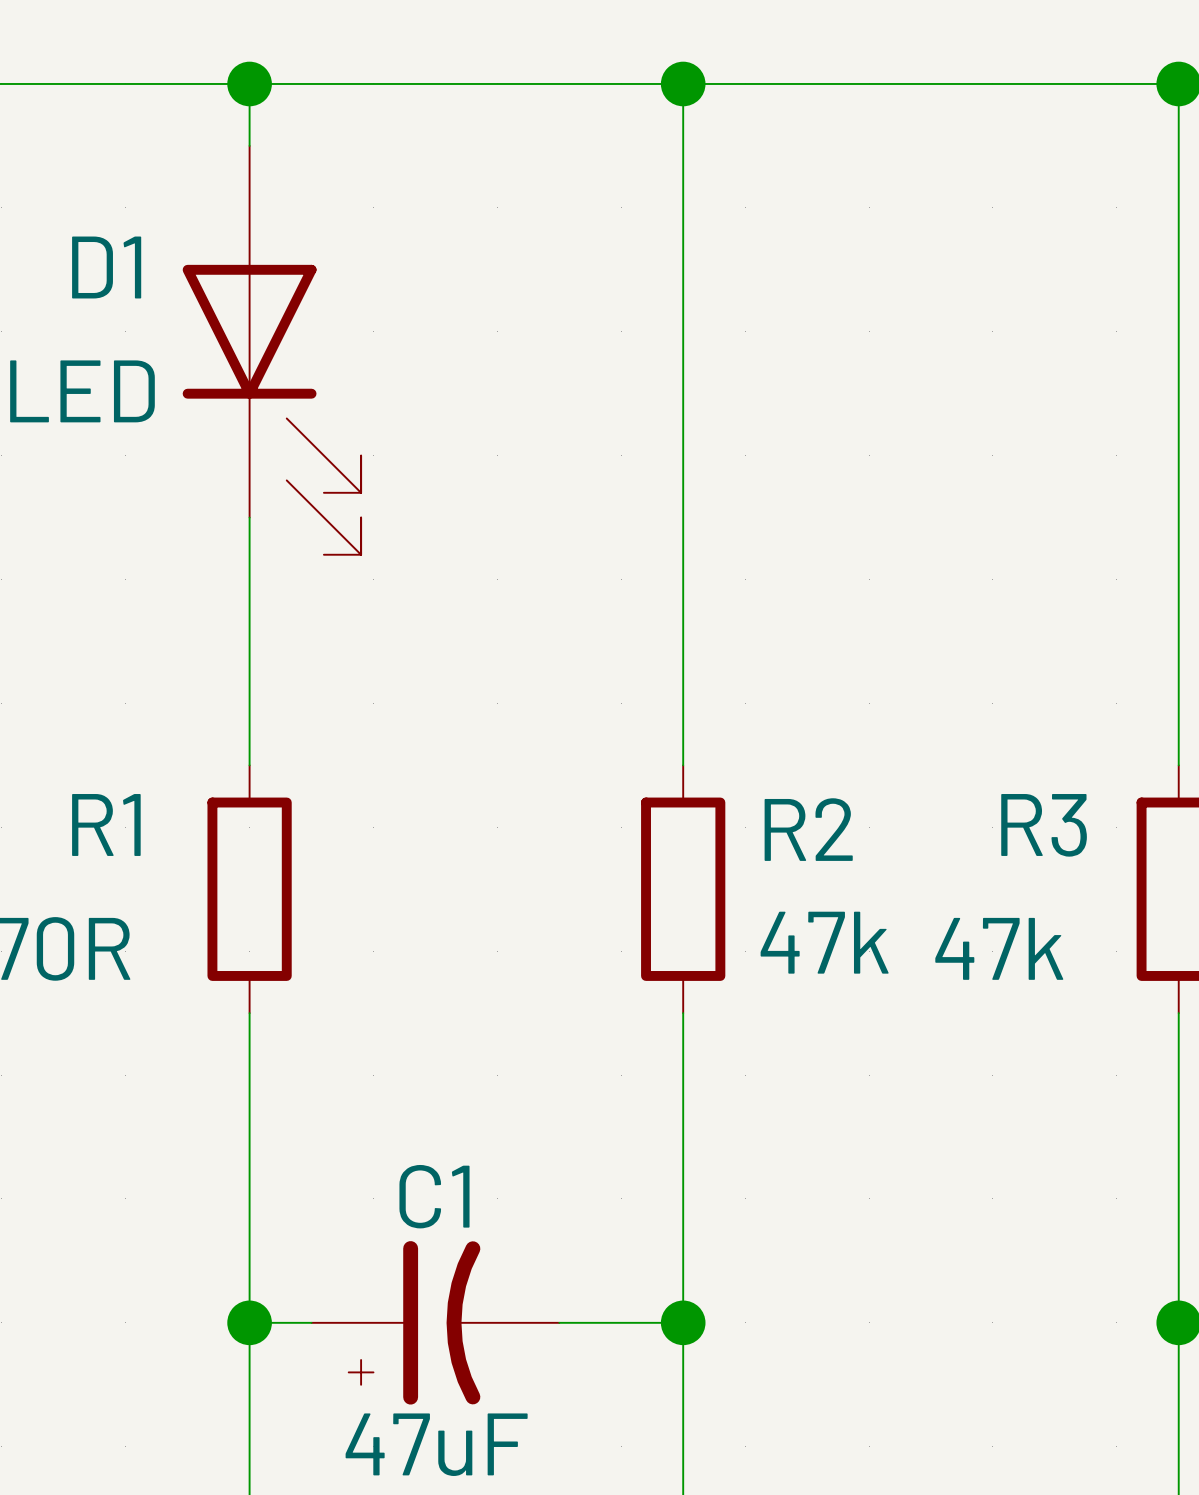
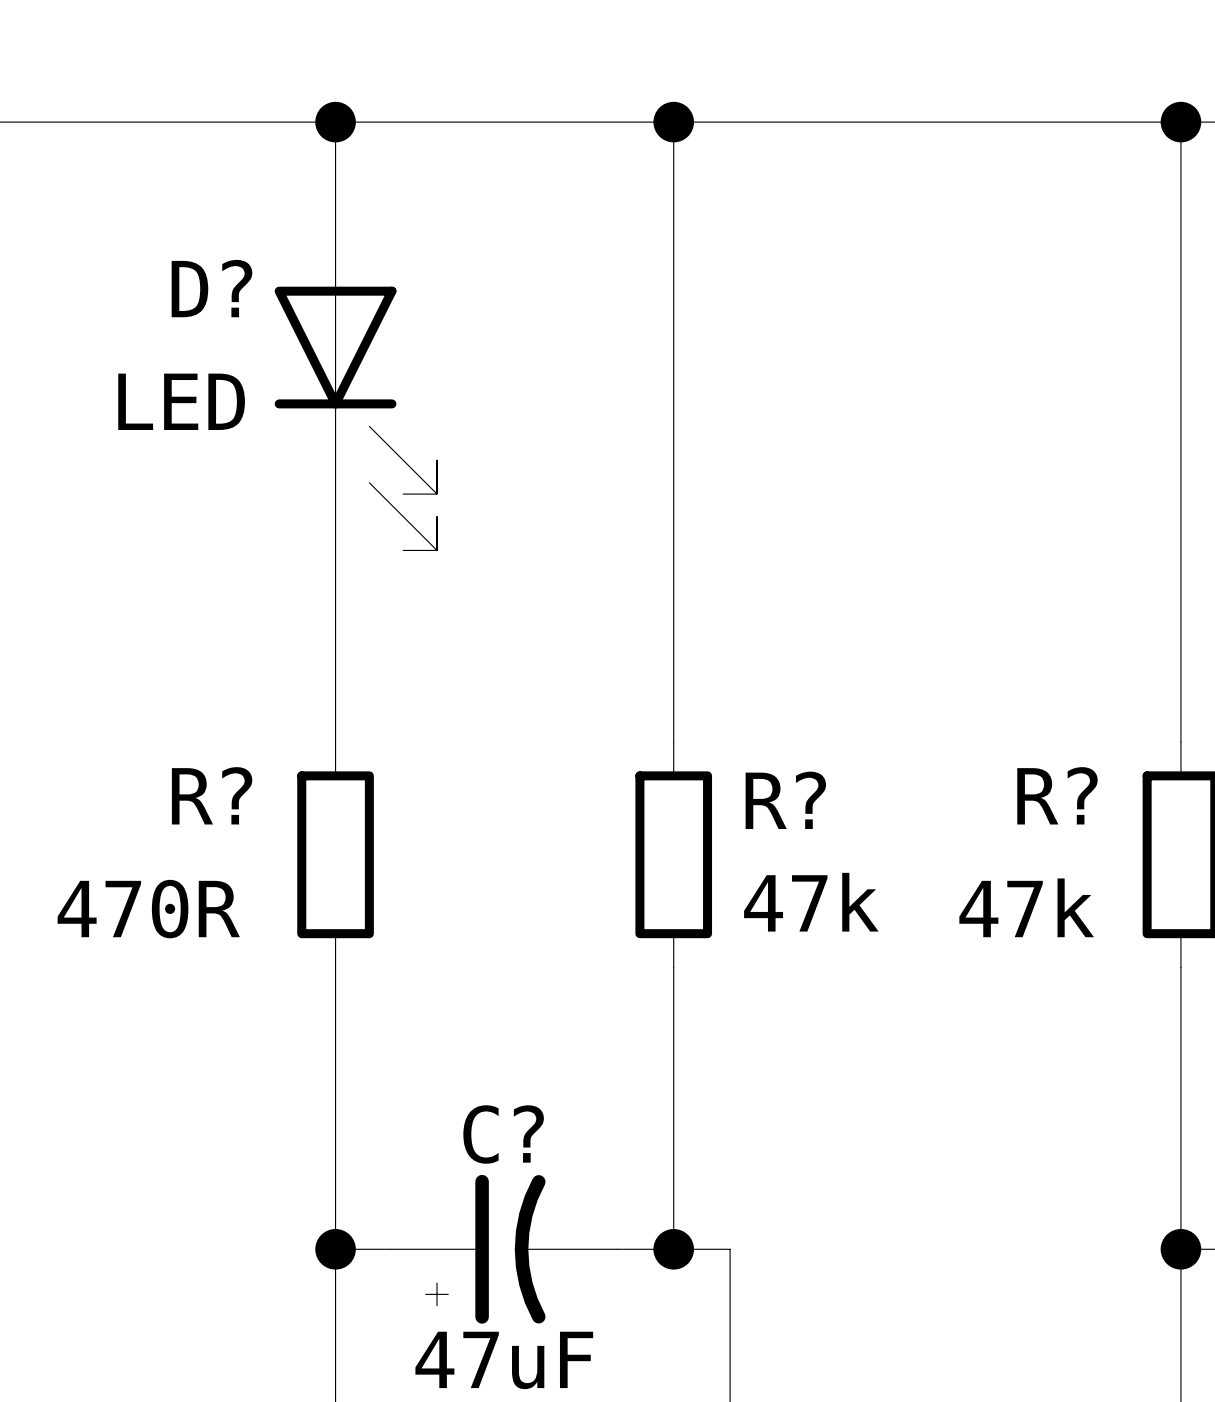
wire: (683, 83) (683, 765) -> (673, 122) (673, 742)
junction position: (683, 83) -> (673, 122)
D1 name: D1 (106, 267) -> D? (211, 288)
R1 name: R1 (106, 824) -> R? (212, 795)
R3 name: R3 (1044, 825) -> R? (1057, 795)
R?: none -> 47k (673, 854)
R2: 47k (683, 889) -> none
wire: (683, 1013) (683, 1322) -> (673, 967) (673, 1249)
C1 name: C1 (434, 1196) -> C? (503, 1134)
junction position: (683, 1322) -> (673, 1249)

